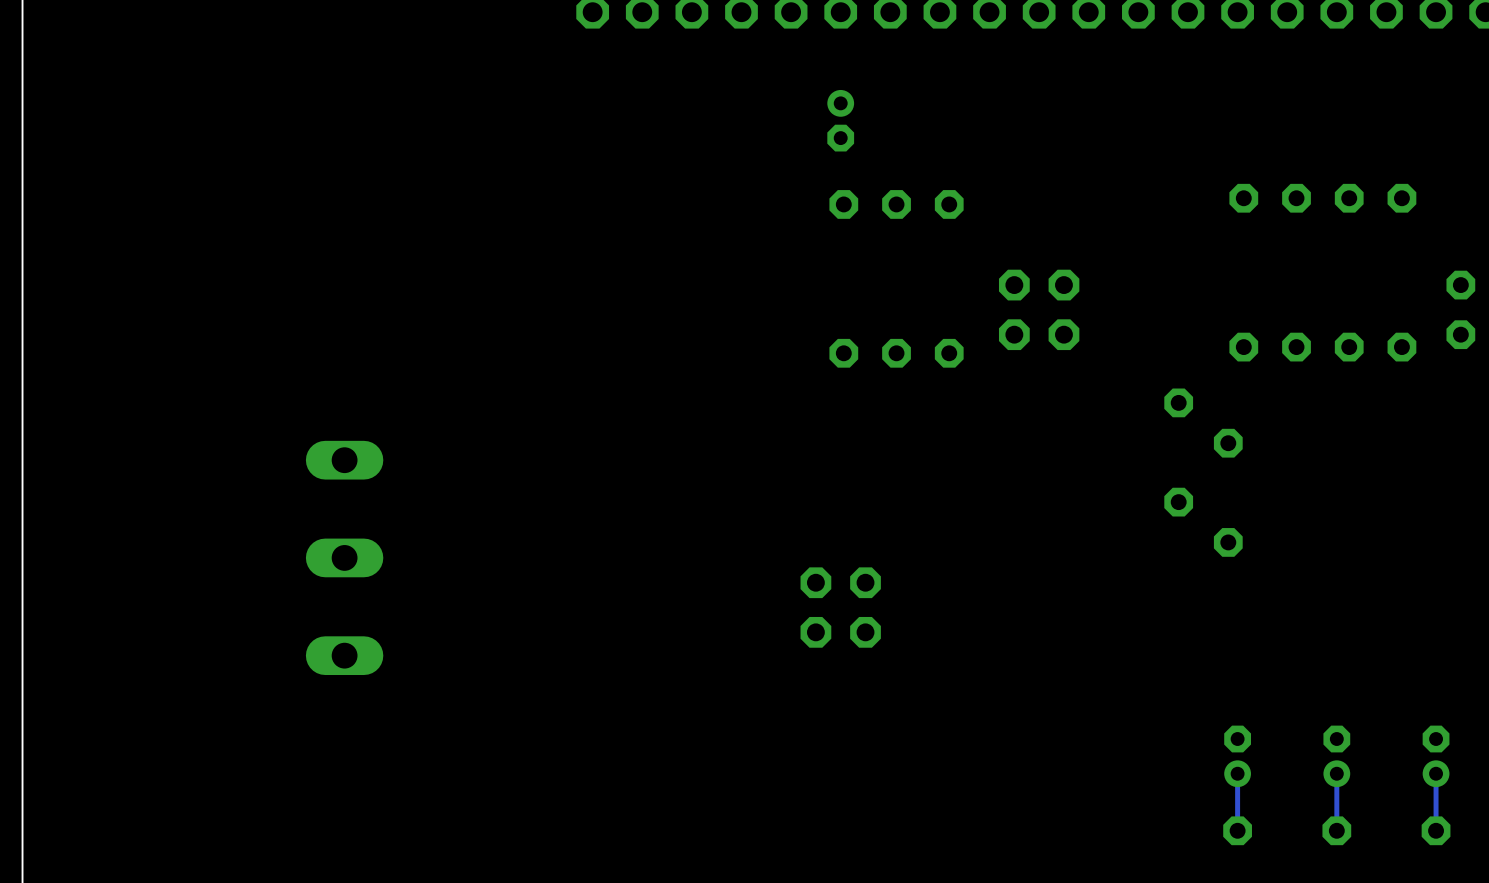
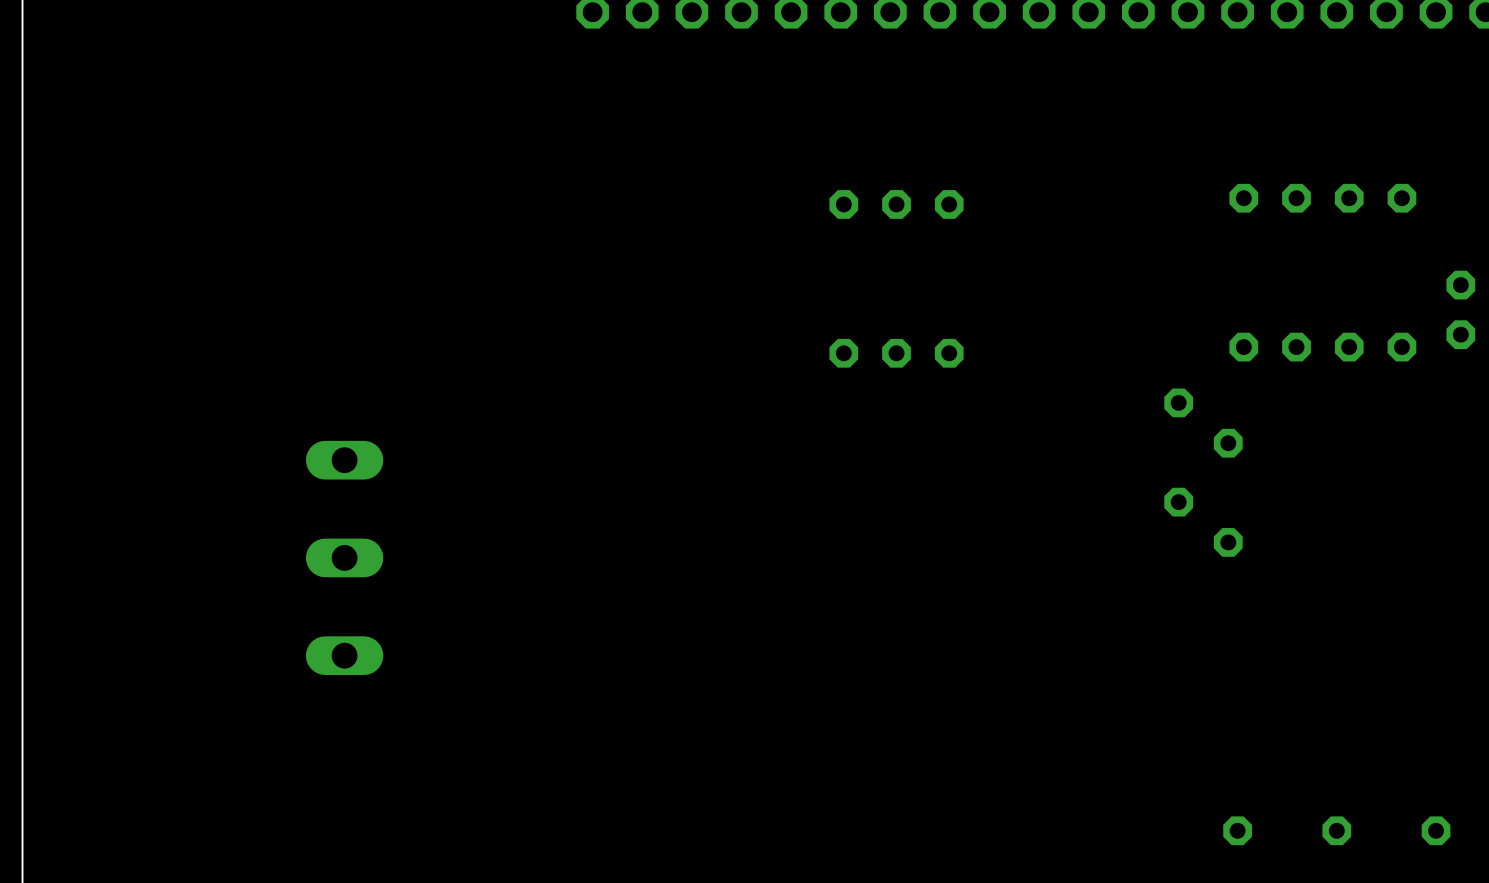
part: (840, 120) -> none
part: (1039, 309) -> none
part: (840, 607) -> none
part: (1237, 756) -> none
part: (1336, 756) -> none
part: (1436, 756) -> none
track: (1237, 773) (1237, 830) -> none
track: (1336, 773) (1336, 830) -> none
track: (1436, 773) (1436, 830) -> none

